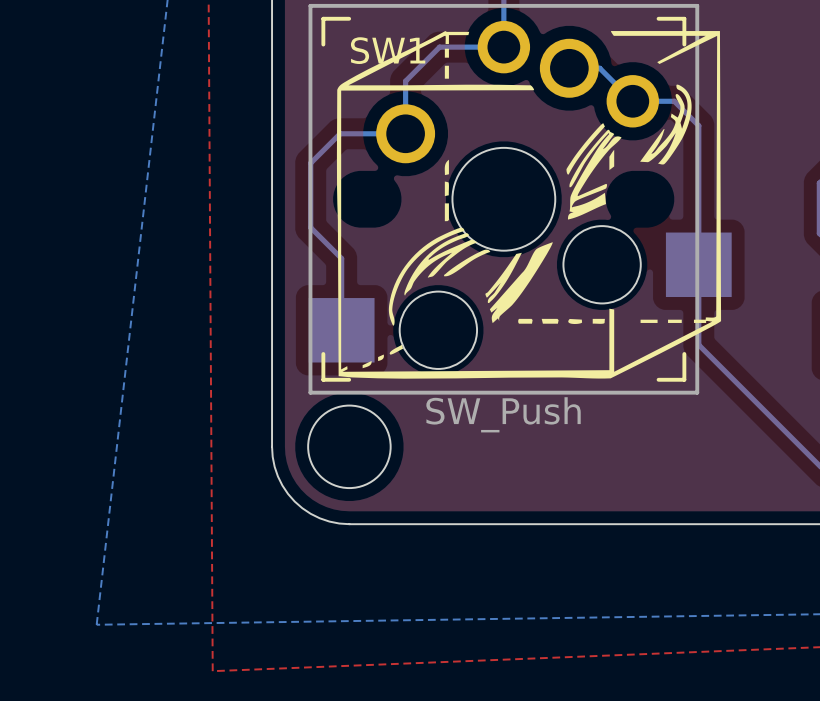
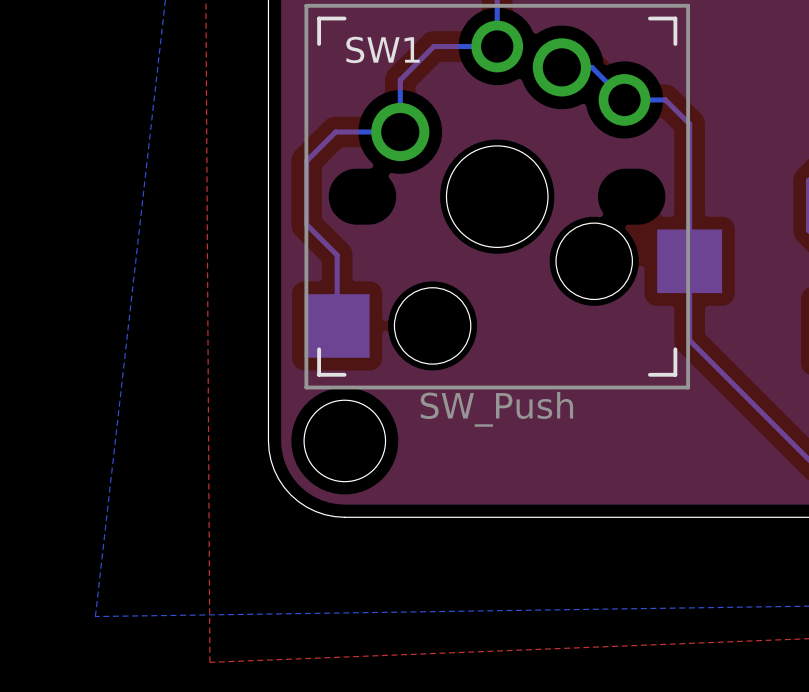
drawing: [336, 31, 722, 379] -> none

